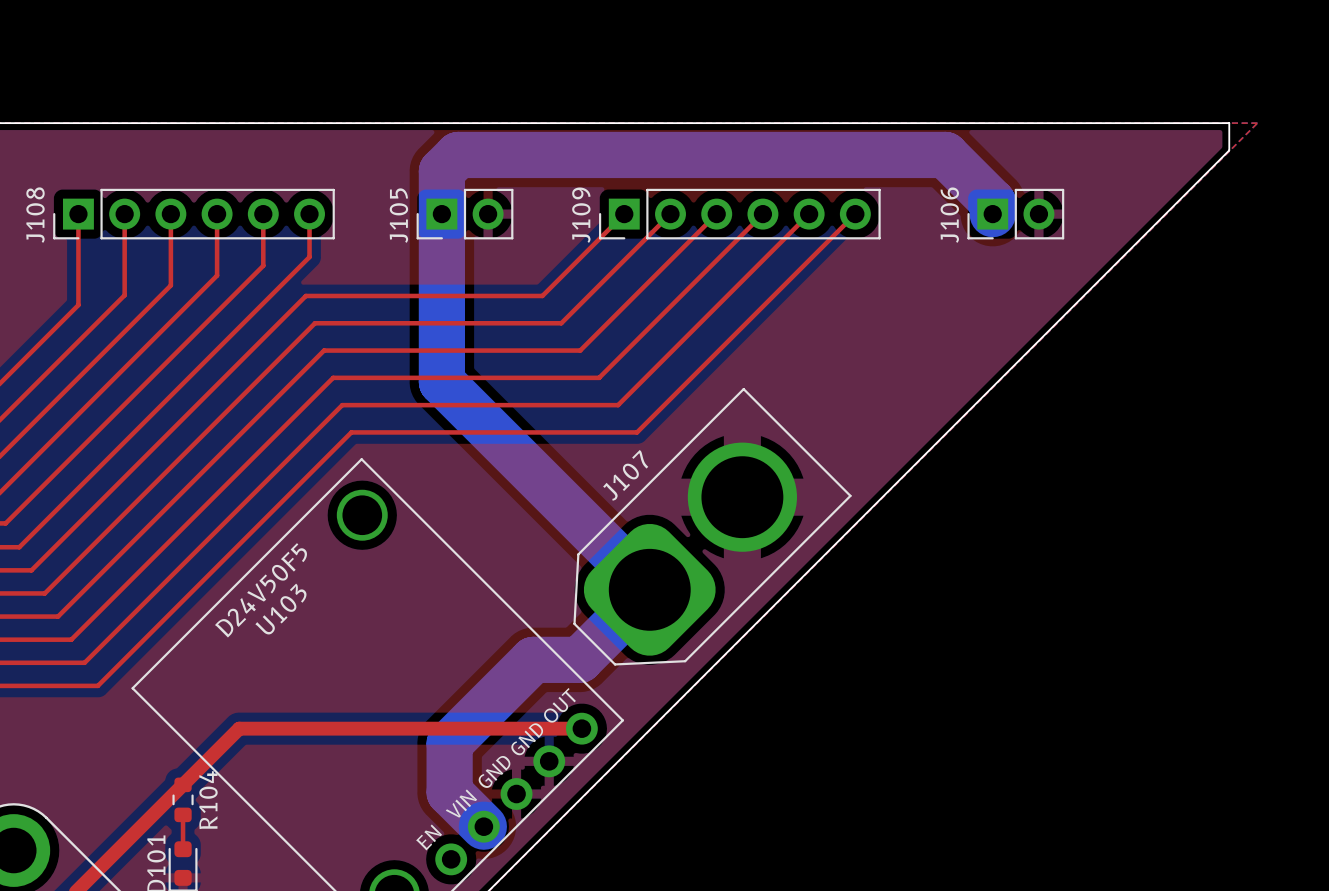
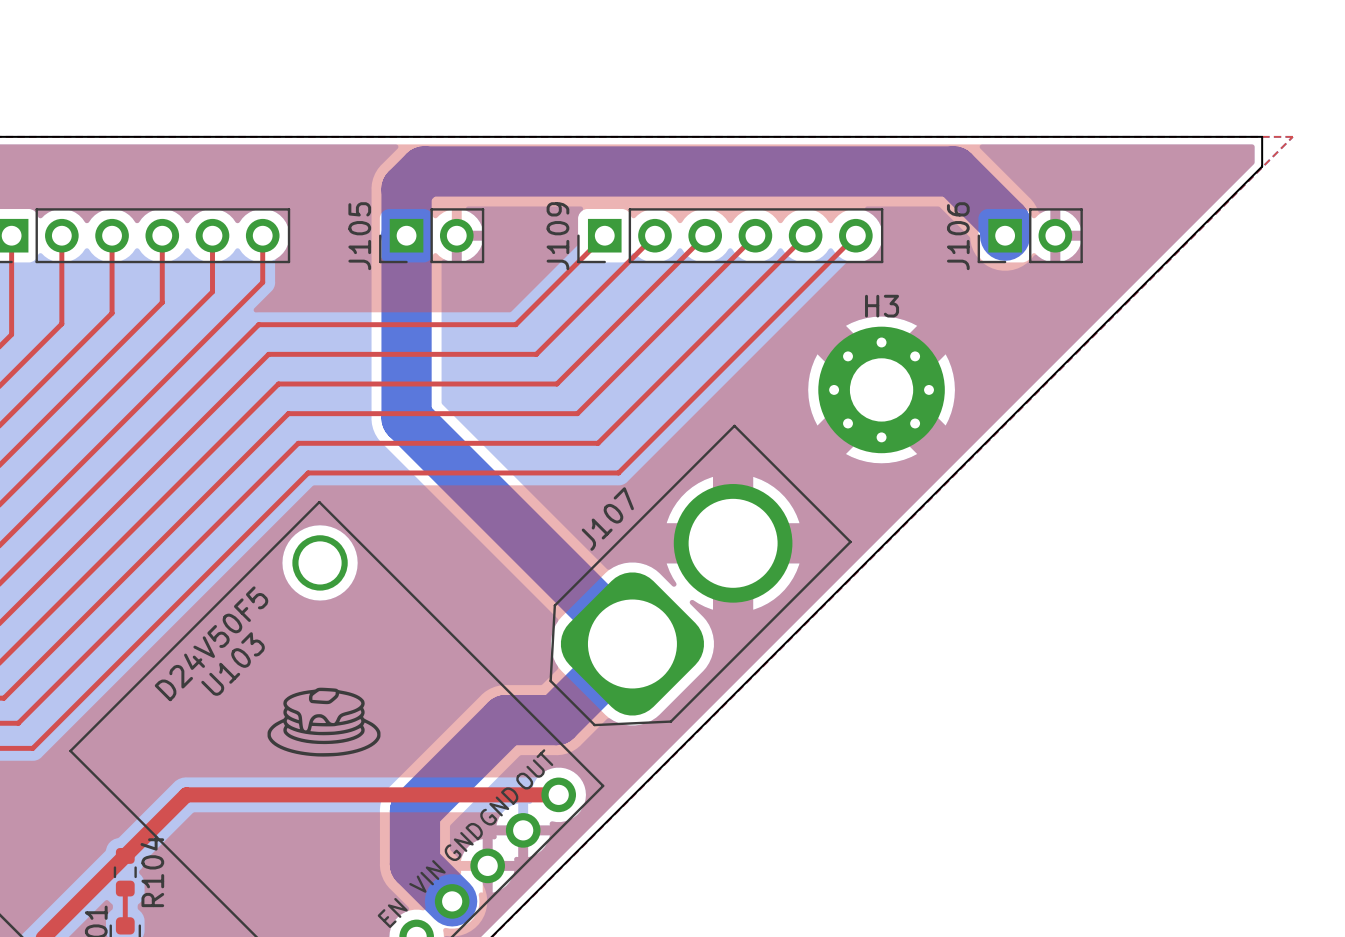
H3: none -> (881, 389)
drawing: none -> [267, 687, 381, 757]

